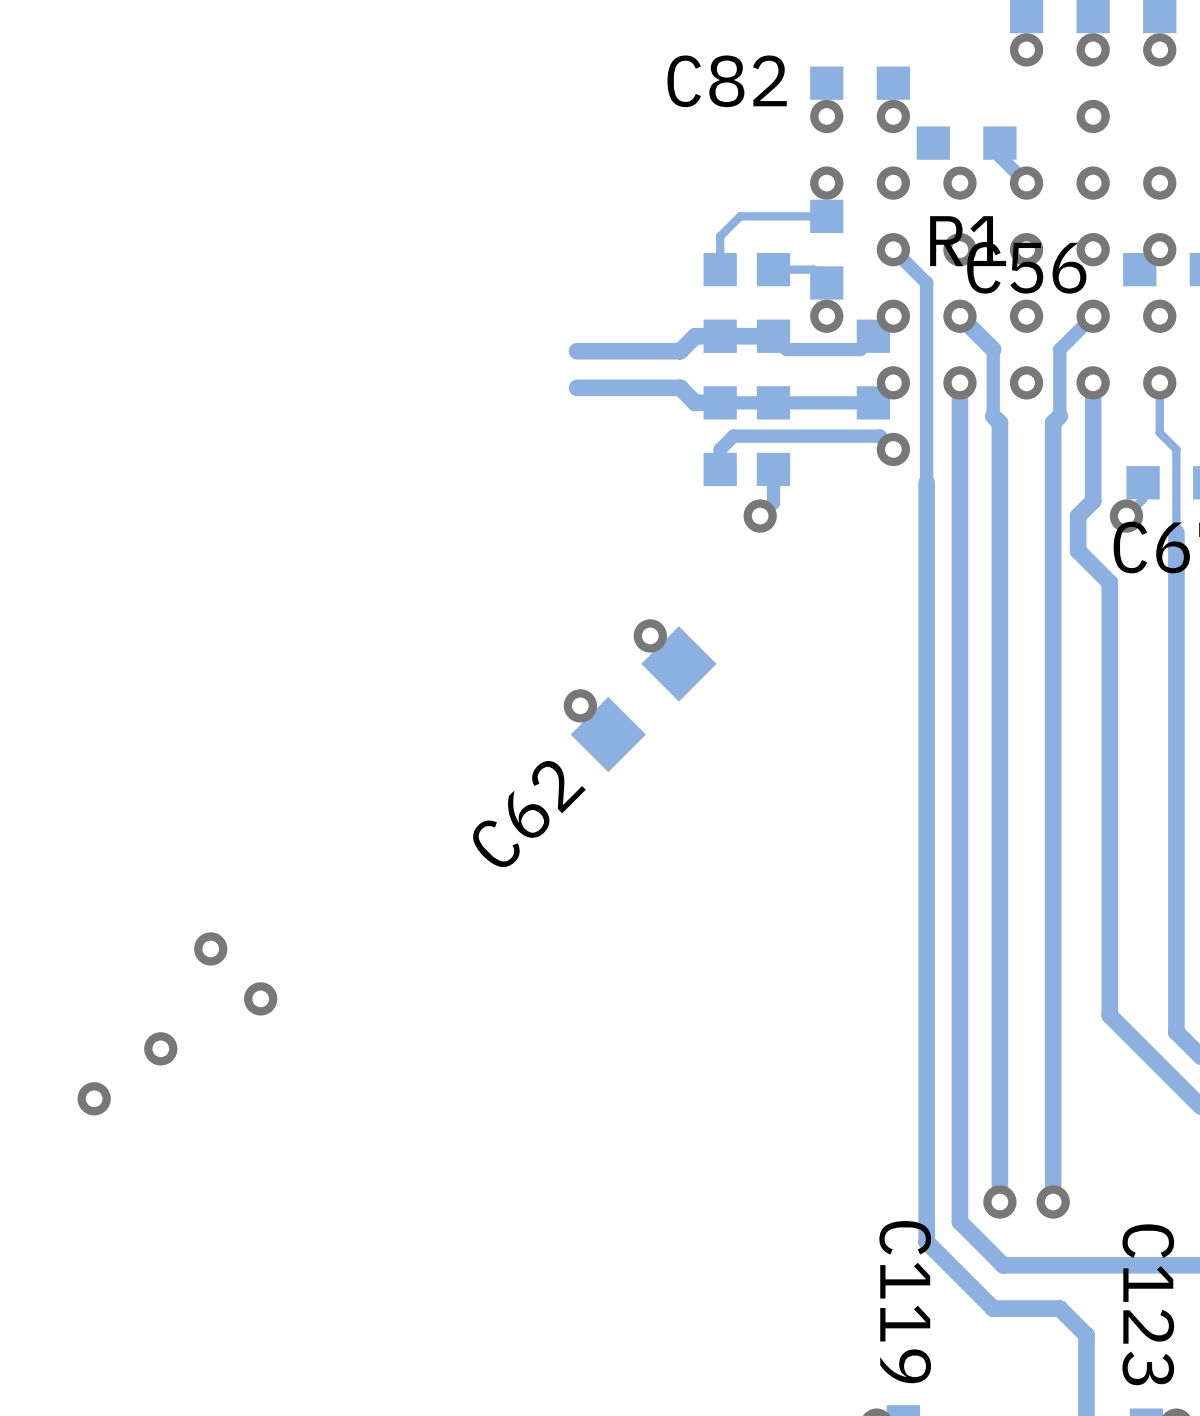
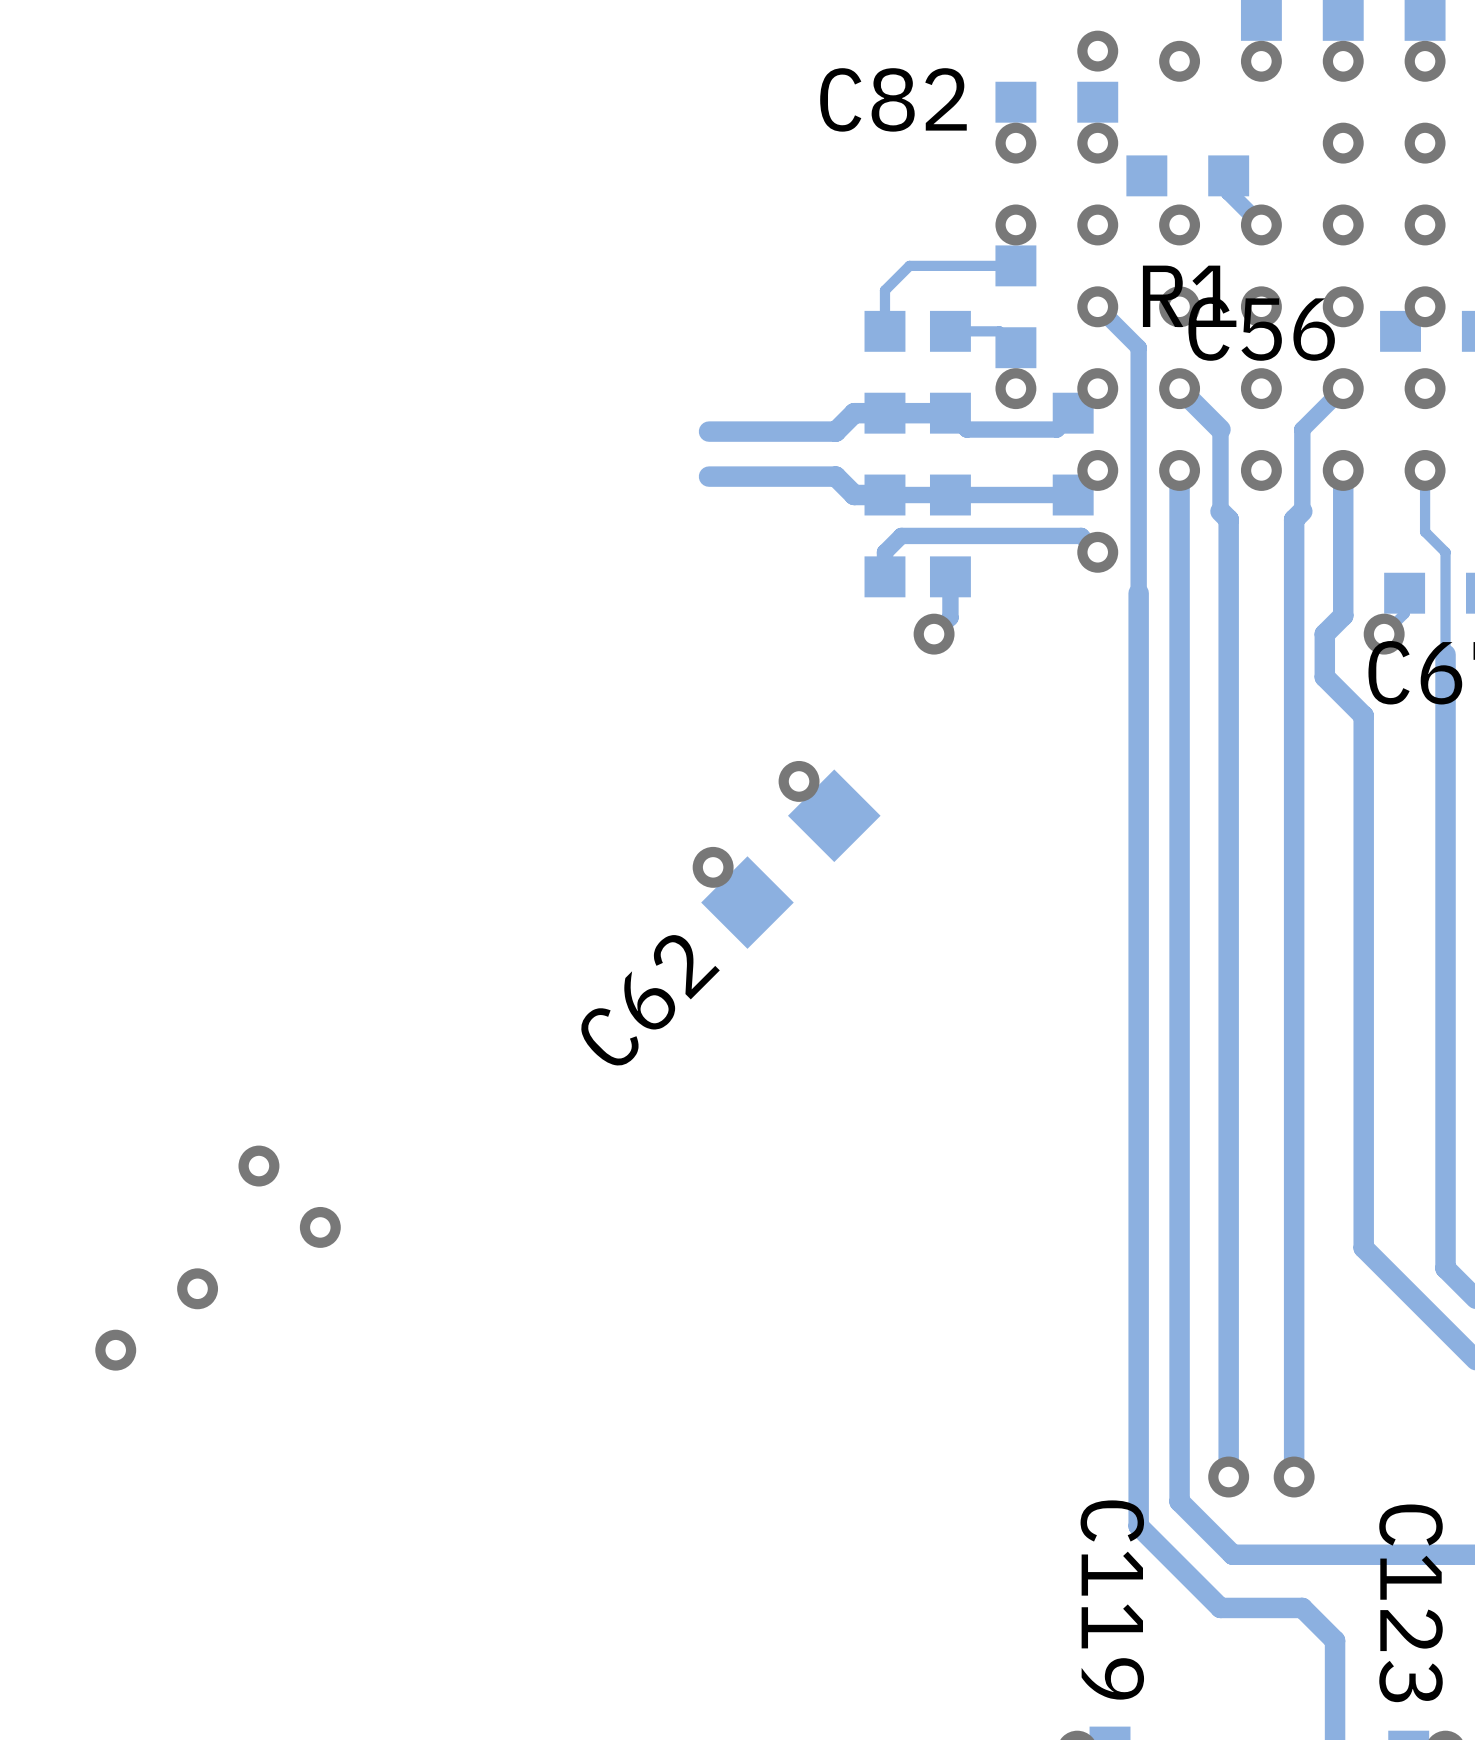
via: none -> (1097, 51)
via: none -> (1179, 61)
via: none -> (1425, 143)

